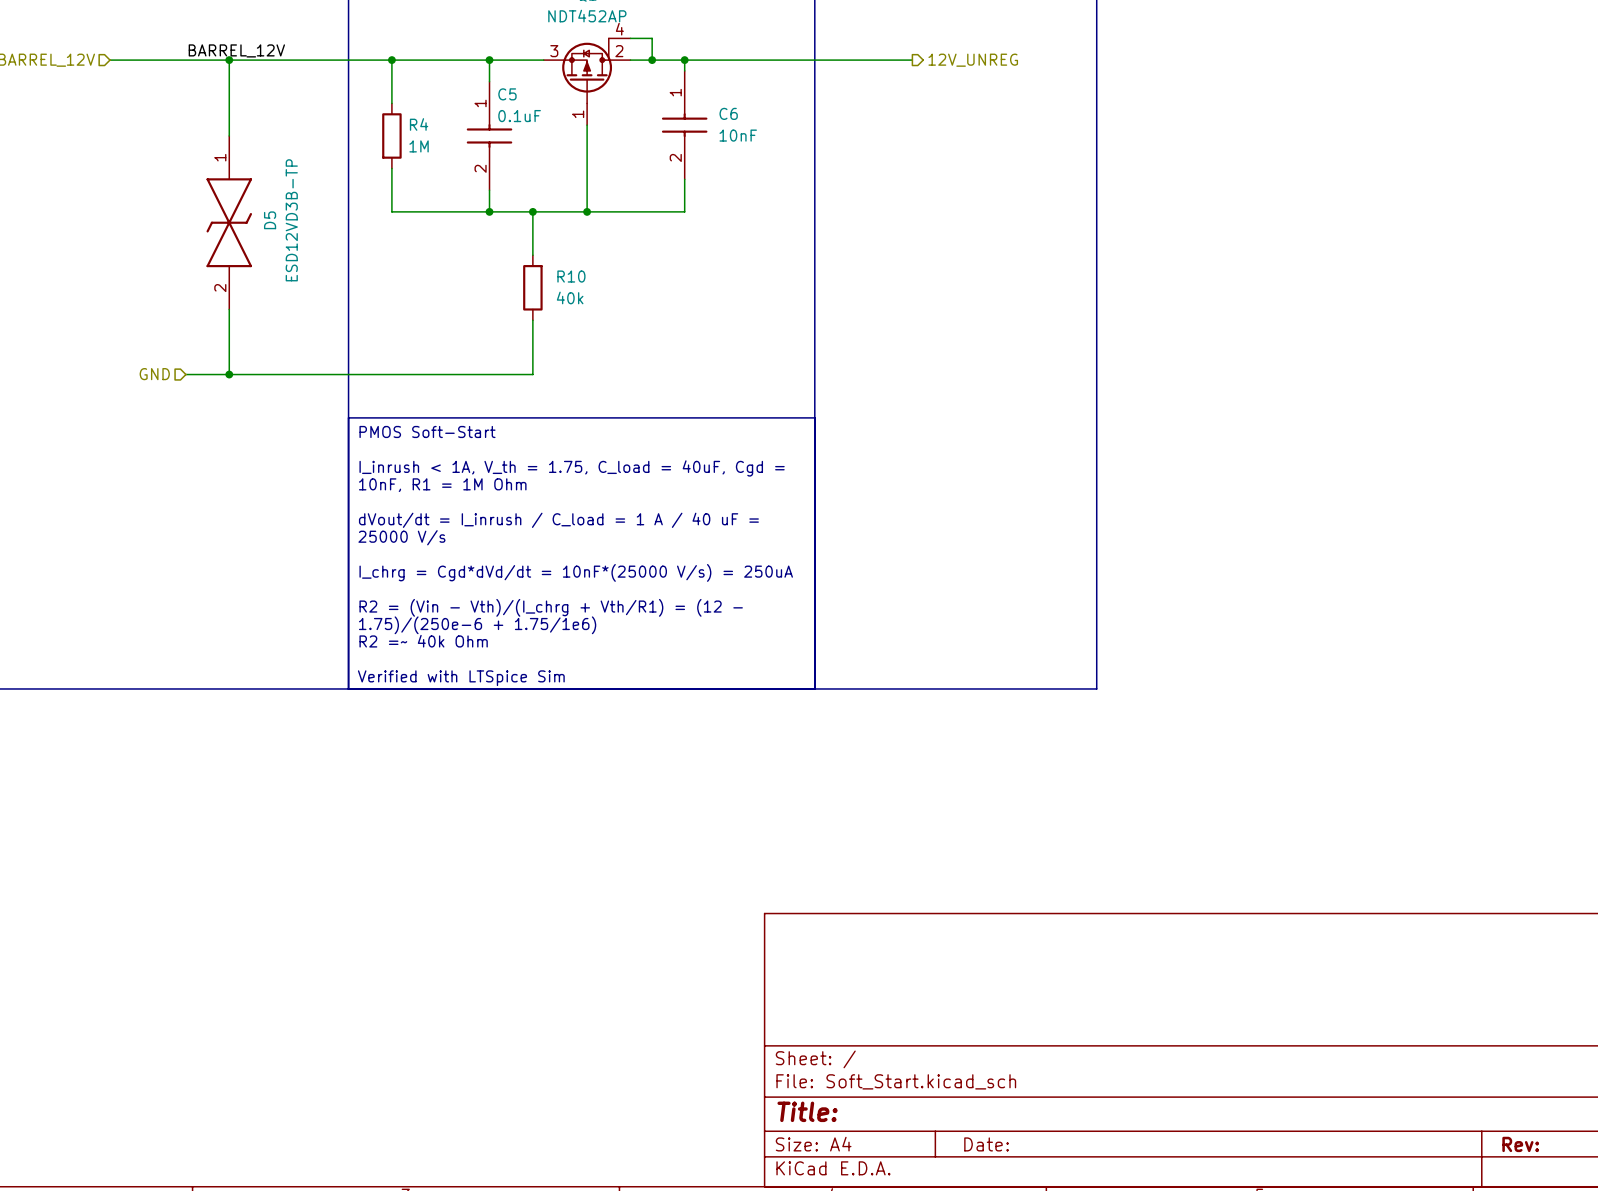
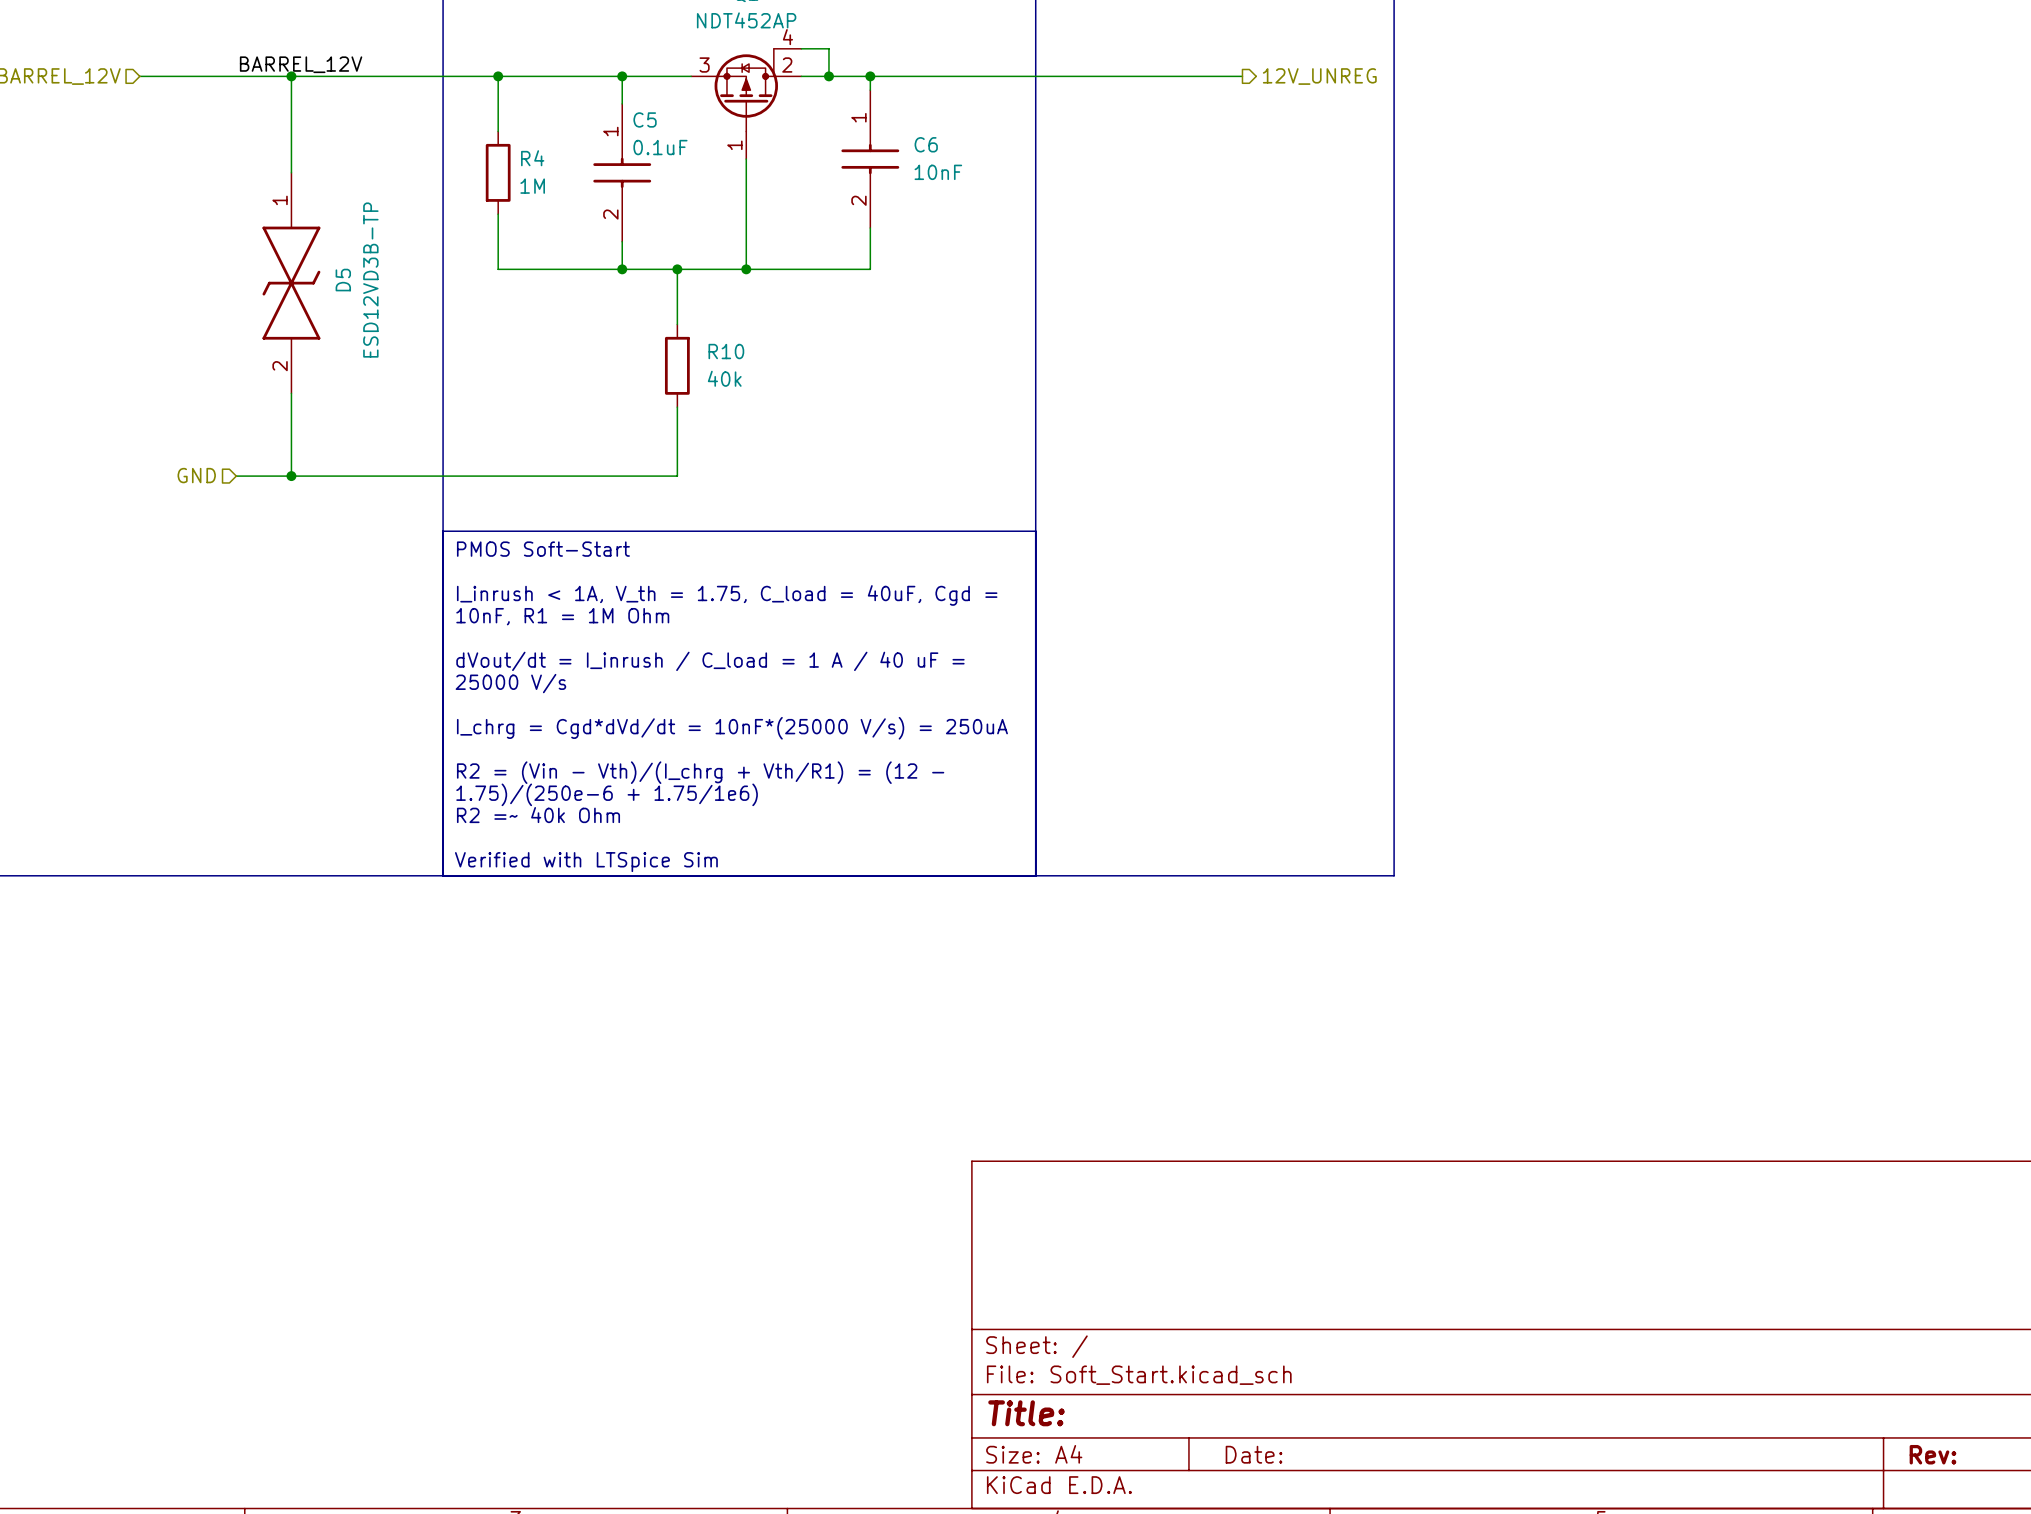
wire: none -> (1159, 76) (1242, 76)
hierarchical label position: 12V_UNREG (973, 60) -> 12V_UNREG (1319, 76)

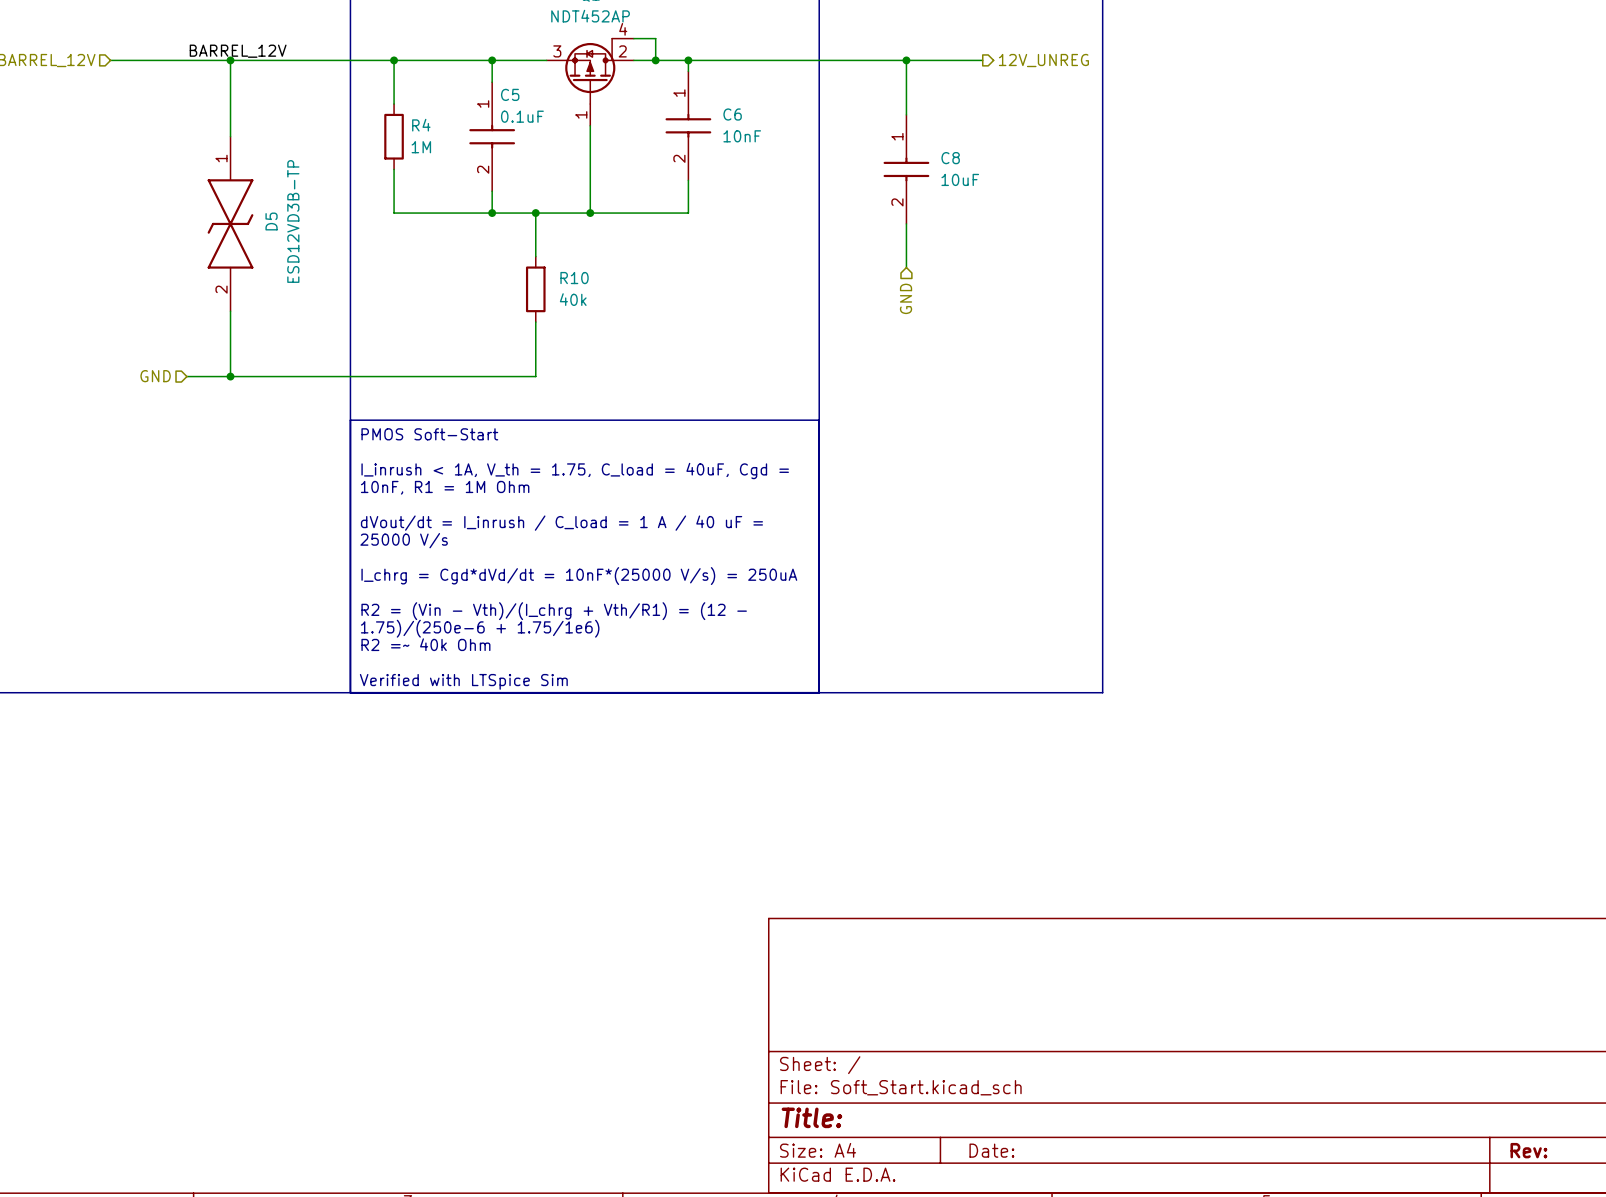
wire: none -> (906, 60) (906, 114)
junction: none -> (906, 60)
C8: none -> 10uF (906, 169)
wire: none -> (906, 223) (906, 267)
hierarchical label: none -> GND (906, 298)

